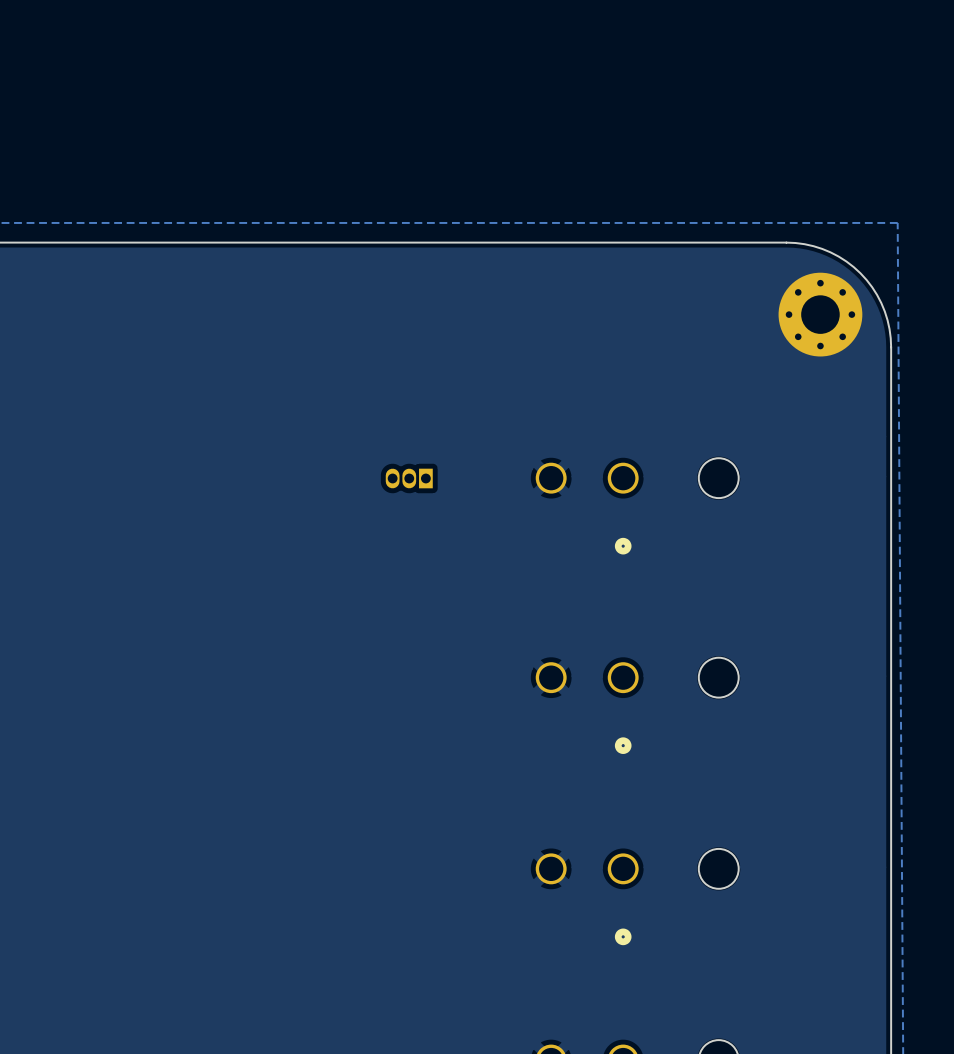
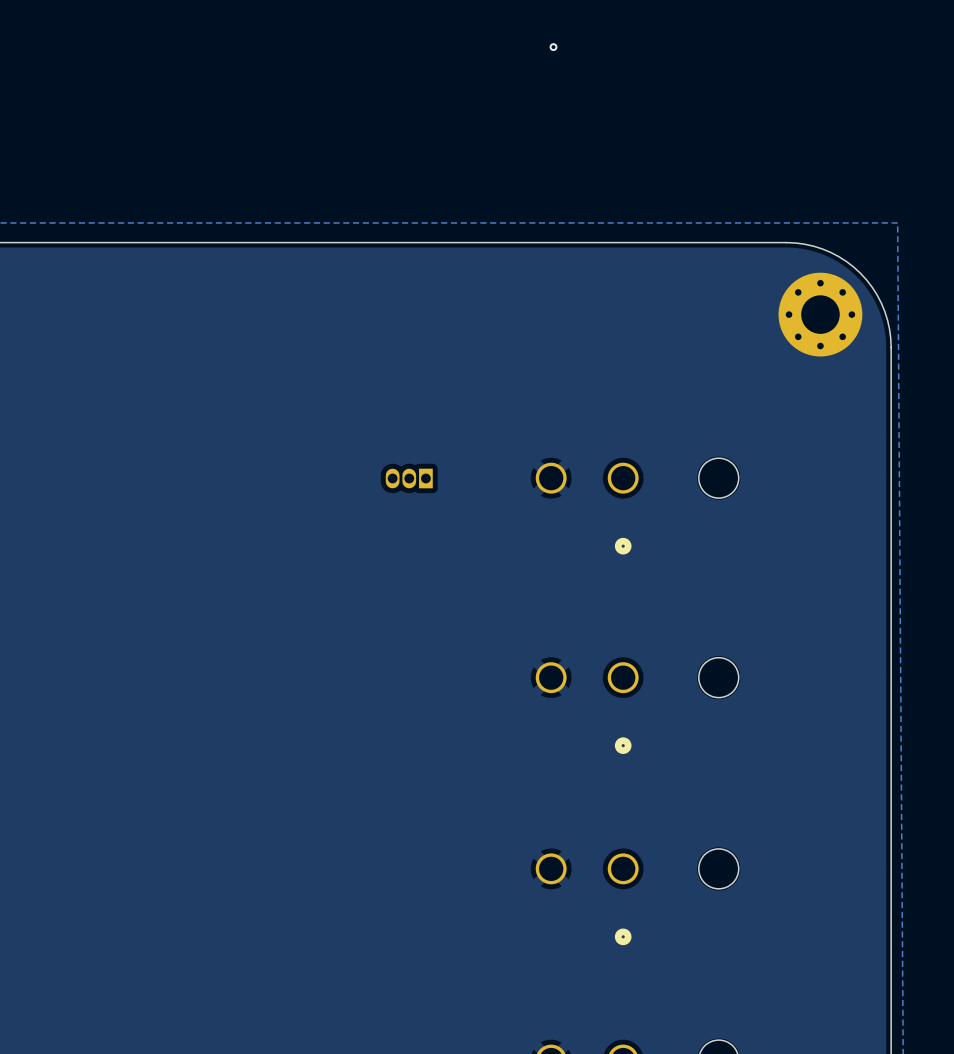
via: none -> (553, 47)

